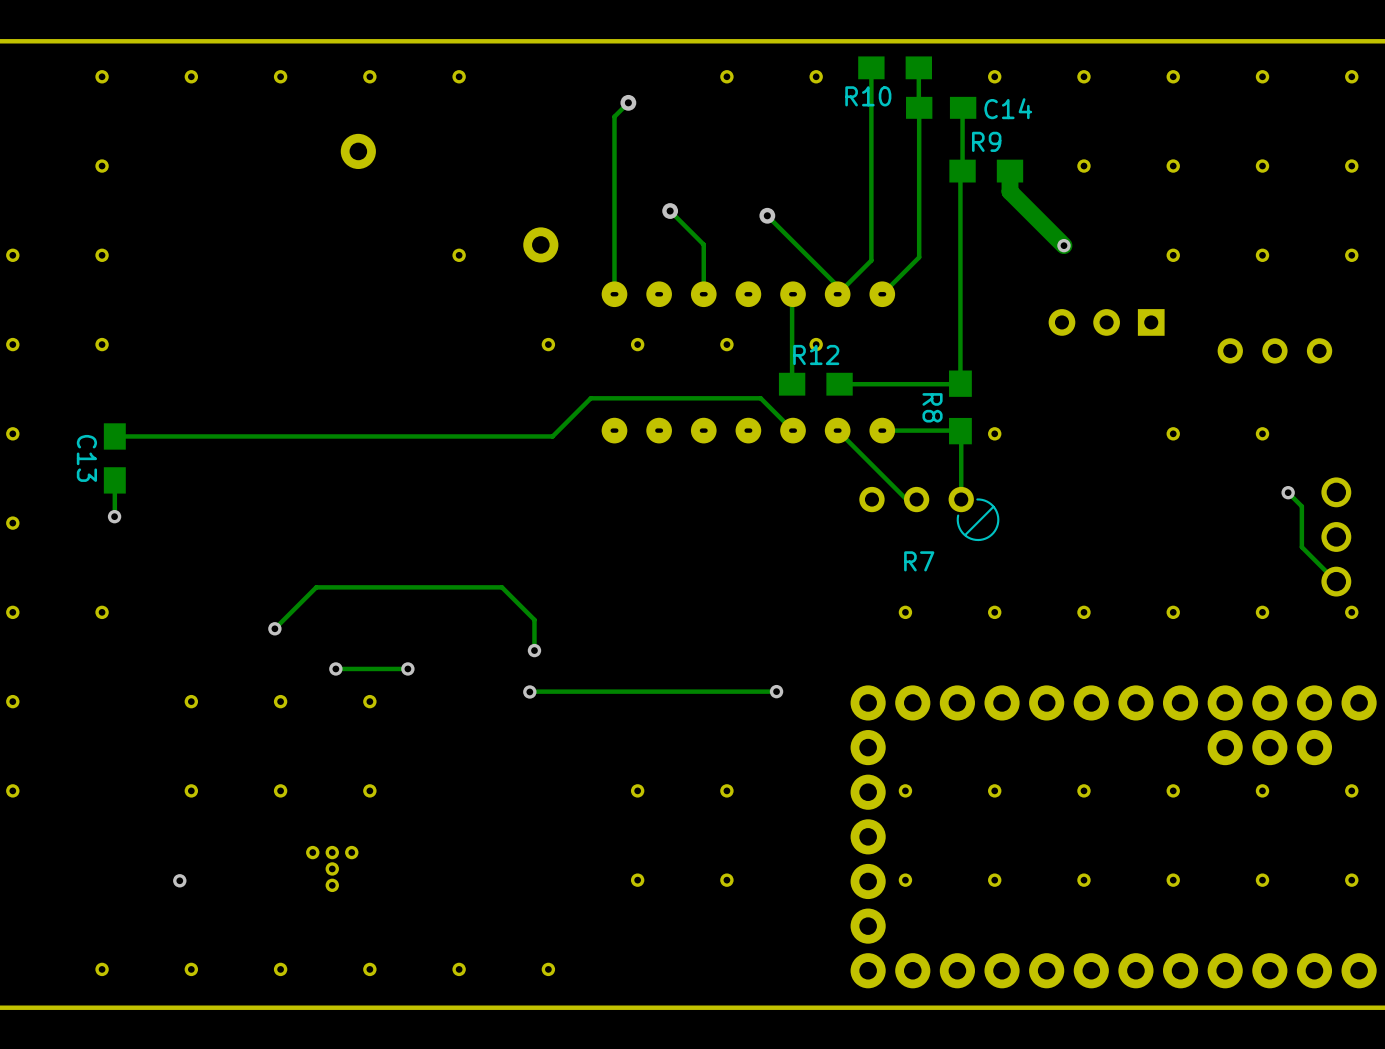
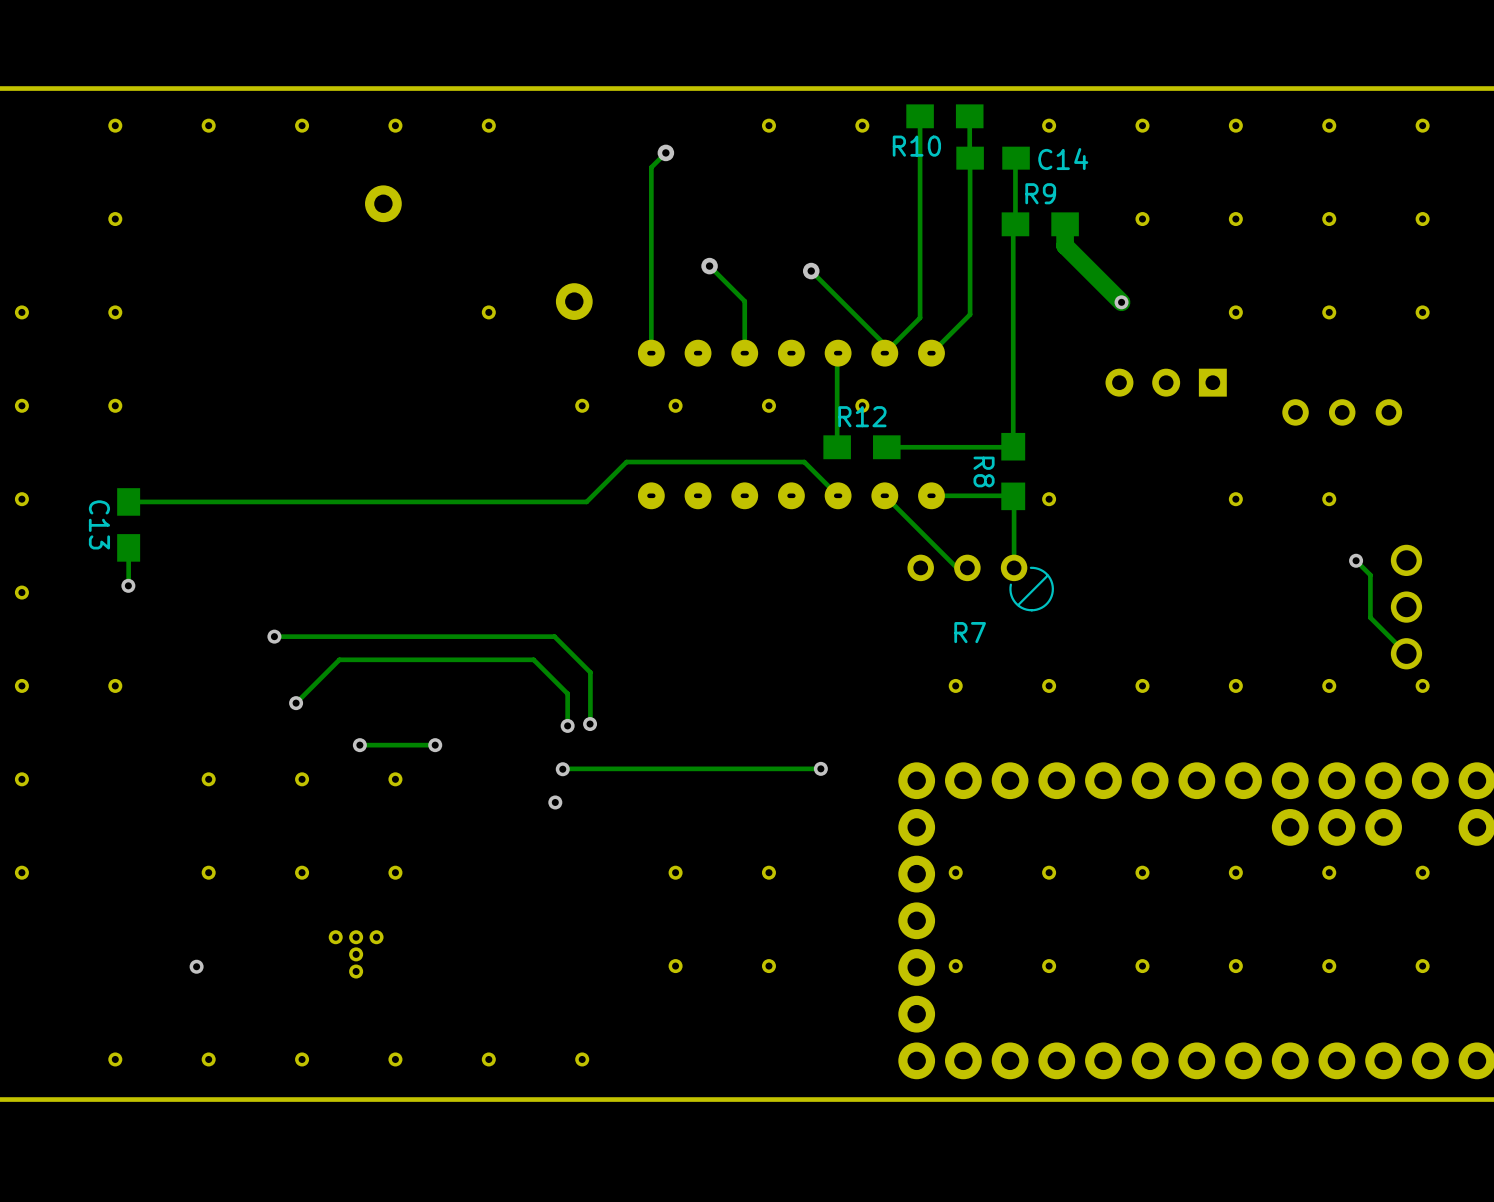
track: none -> (274, 636) (554, 636) (590, 672) (590, 724)
via: none -> (274, 636)
via: none -> (590, 724)
via: none -> (555, 802)

